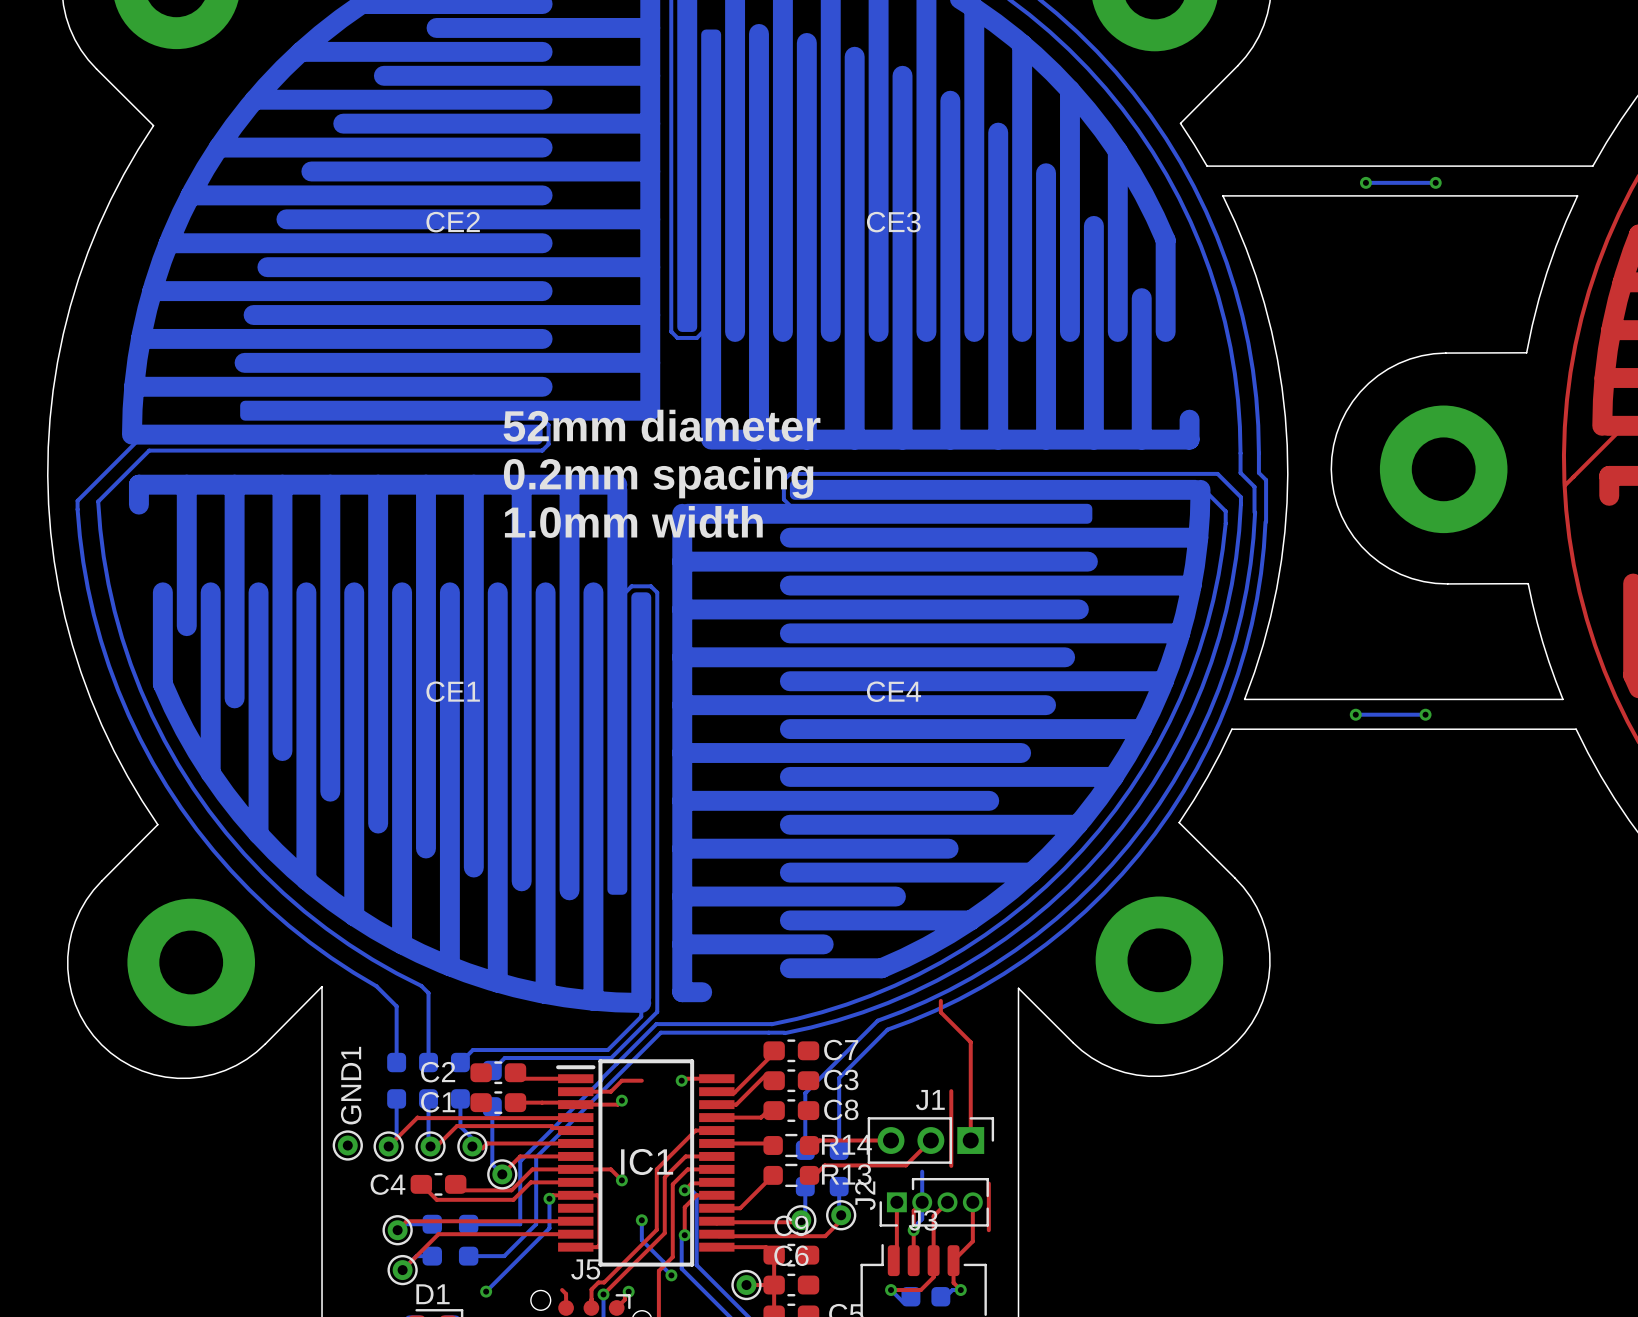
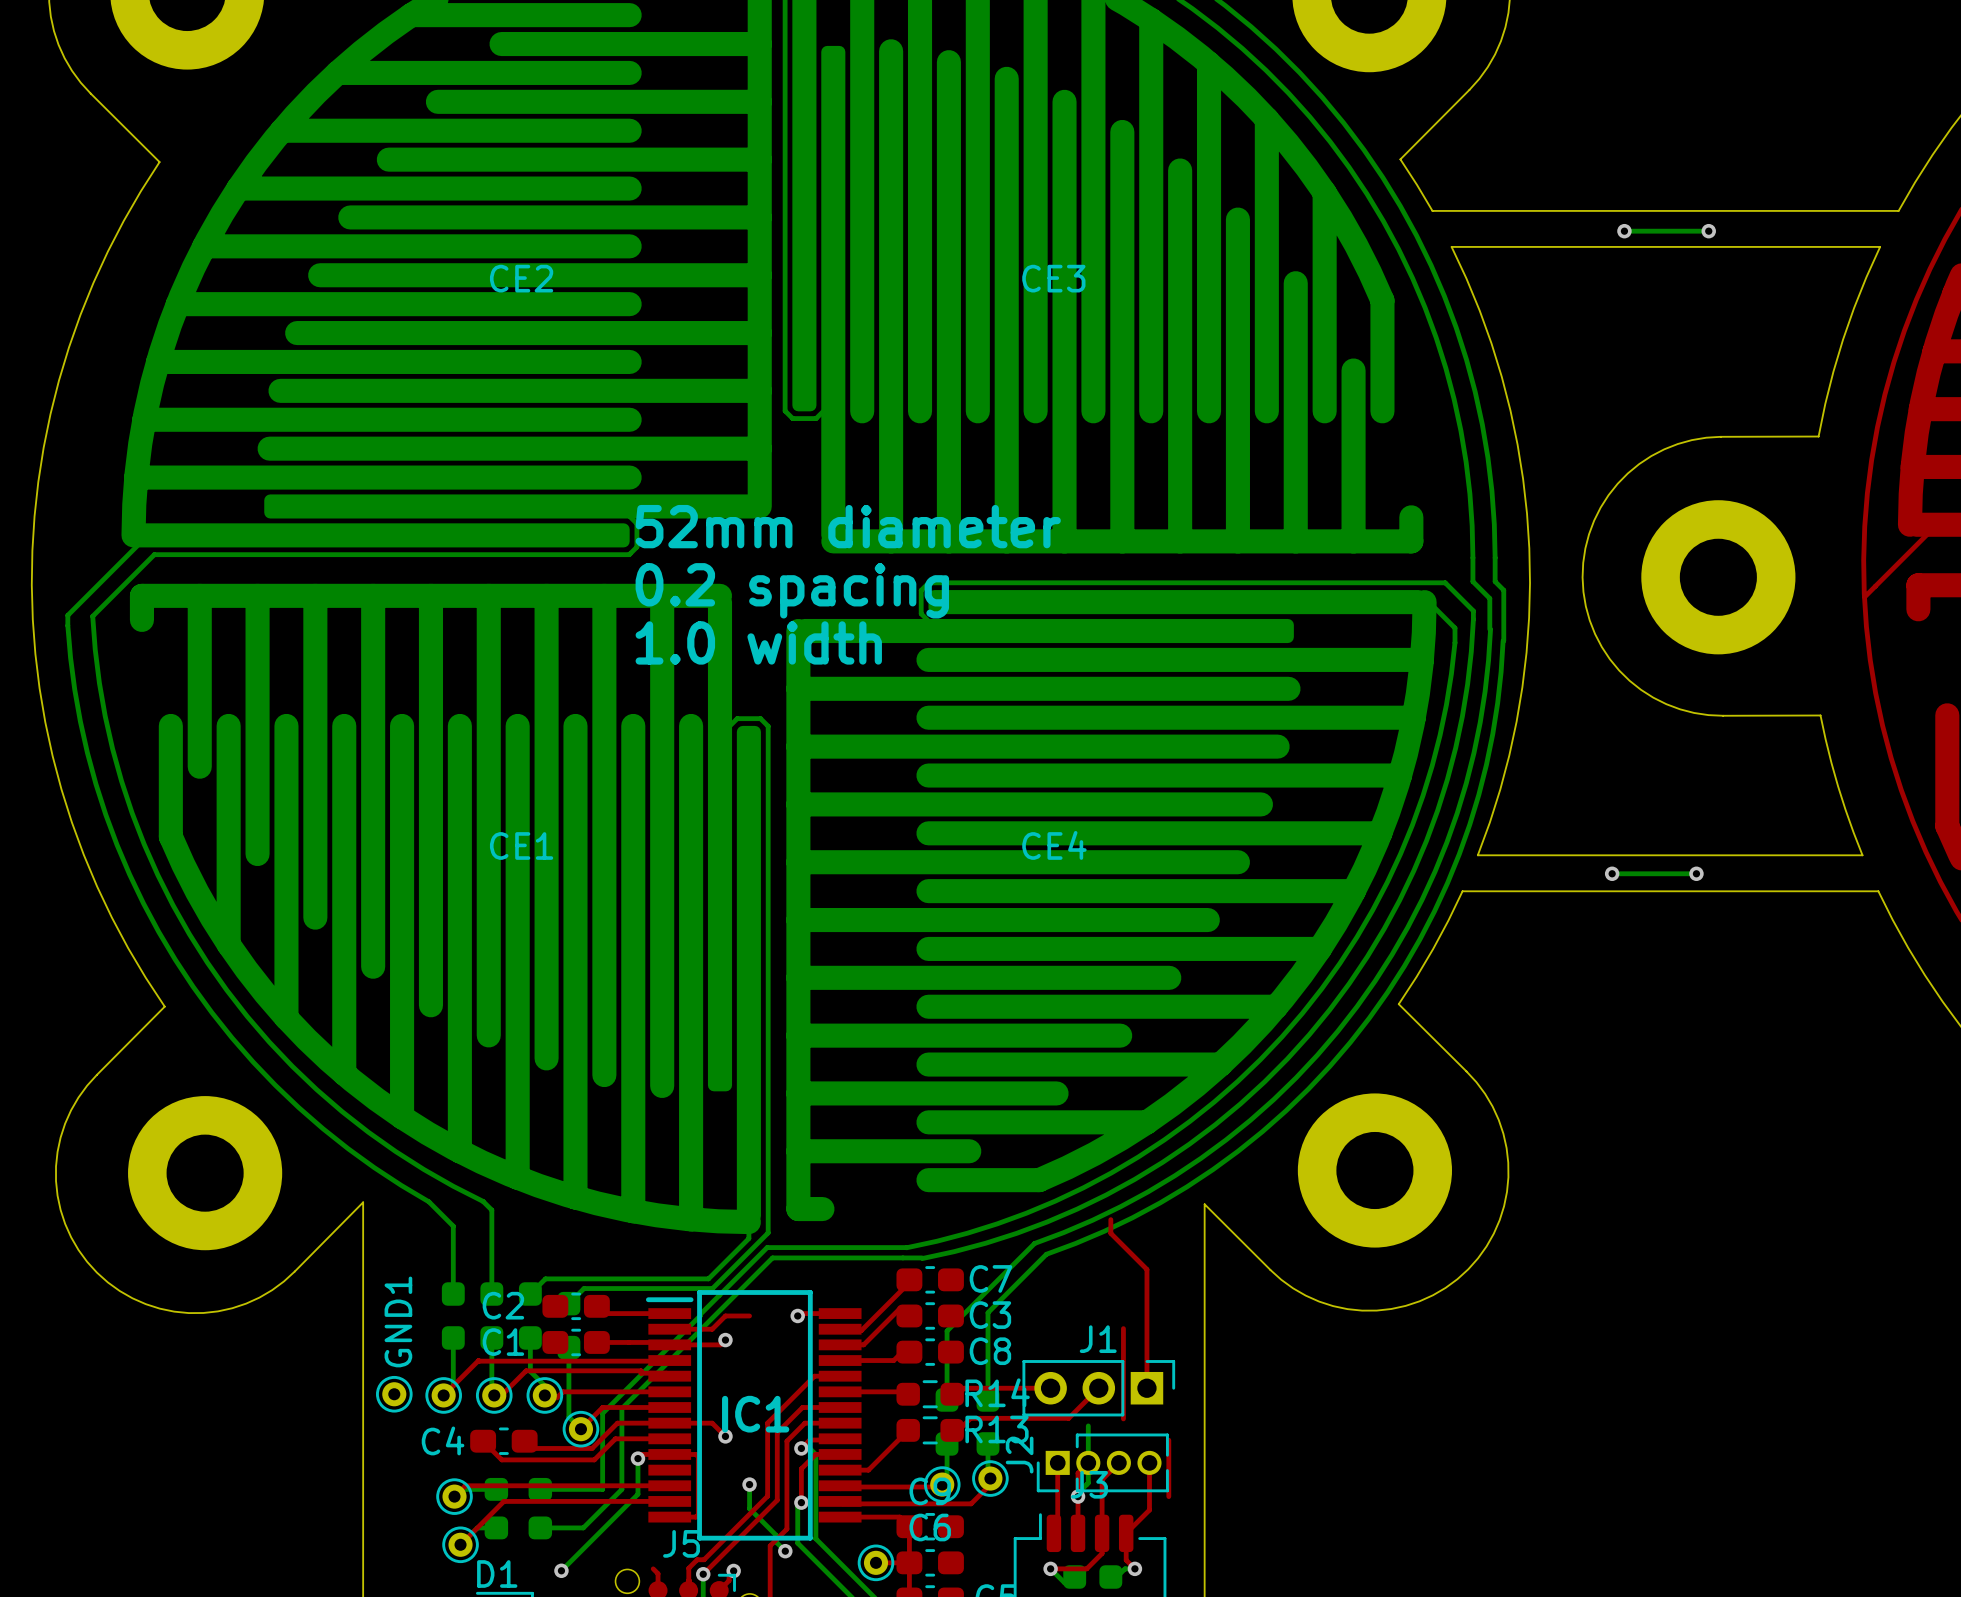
text position: 52mm diameter (661, 425) -> 52mm diameter (848, 526)
text: 0.2mm spacing (658, 478) -> 0.2 spacing (792, 590)
text: 1.0mm width (633, 521) -> 1.0 width (758, 642)

